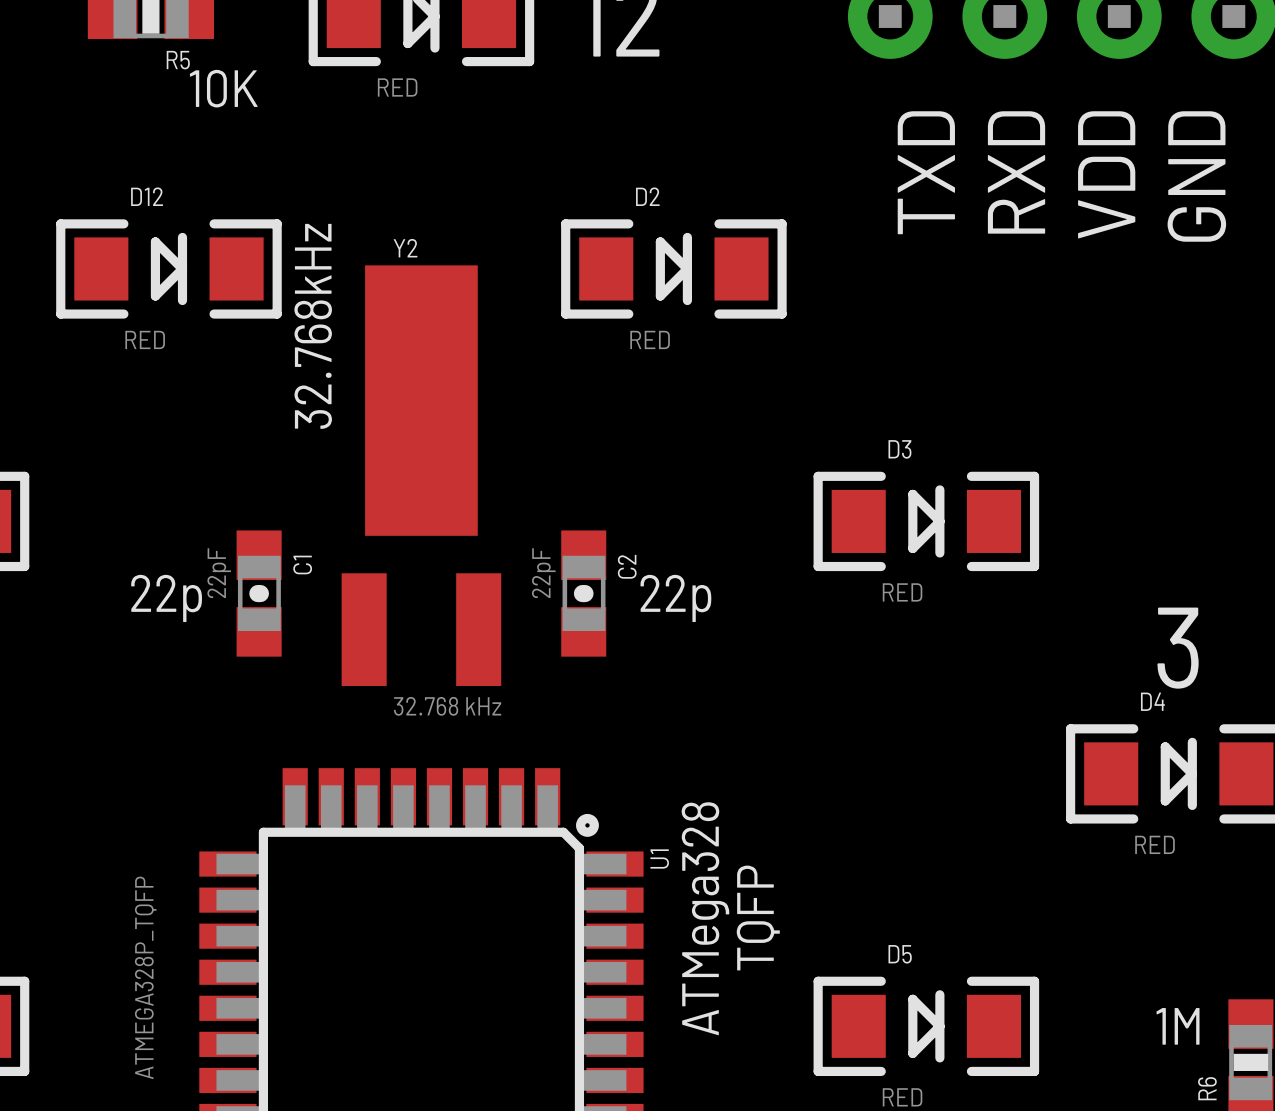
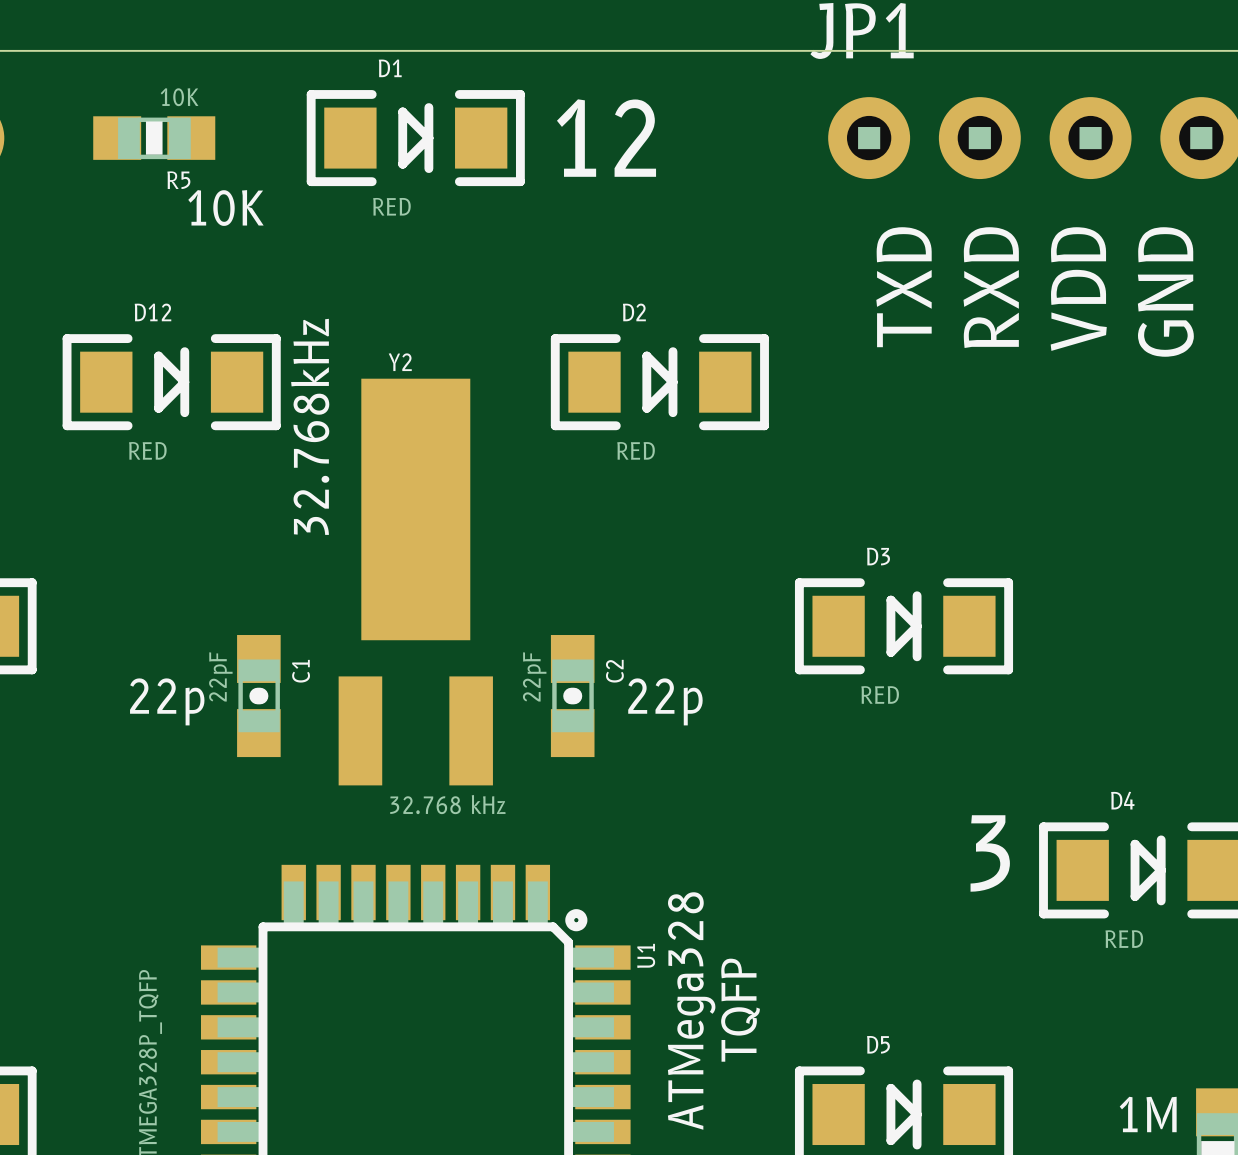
text position: 3 (1178, 648) -> 3 (990, 853)

